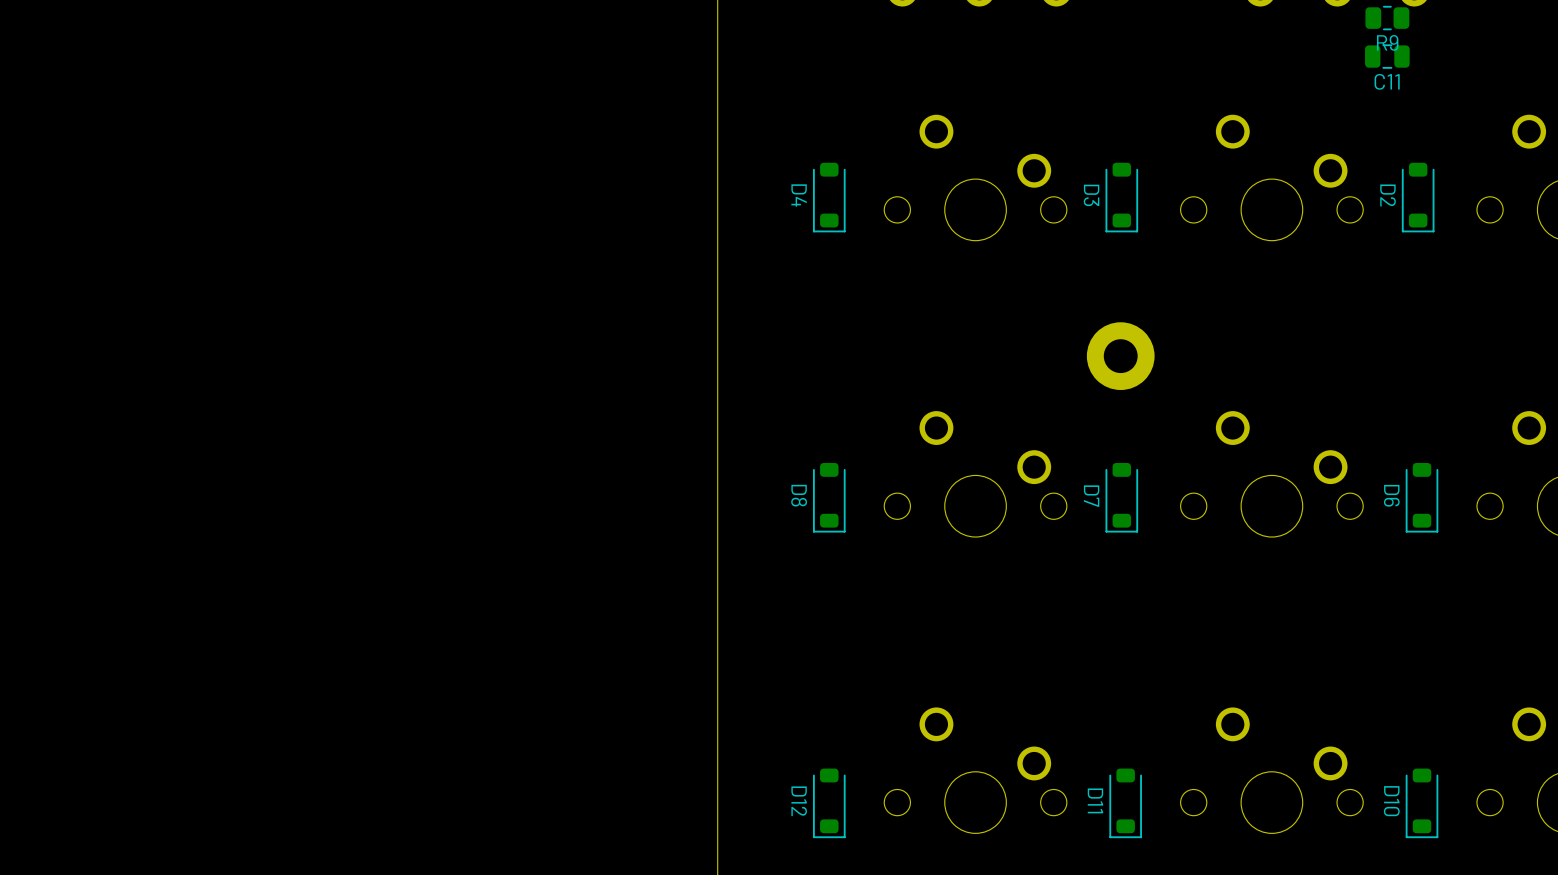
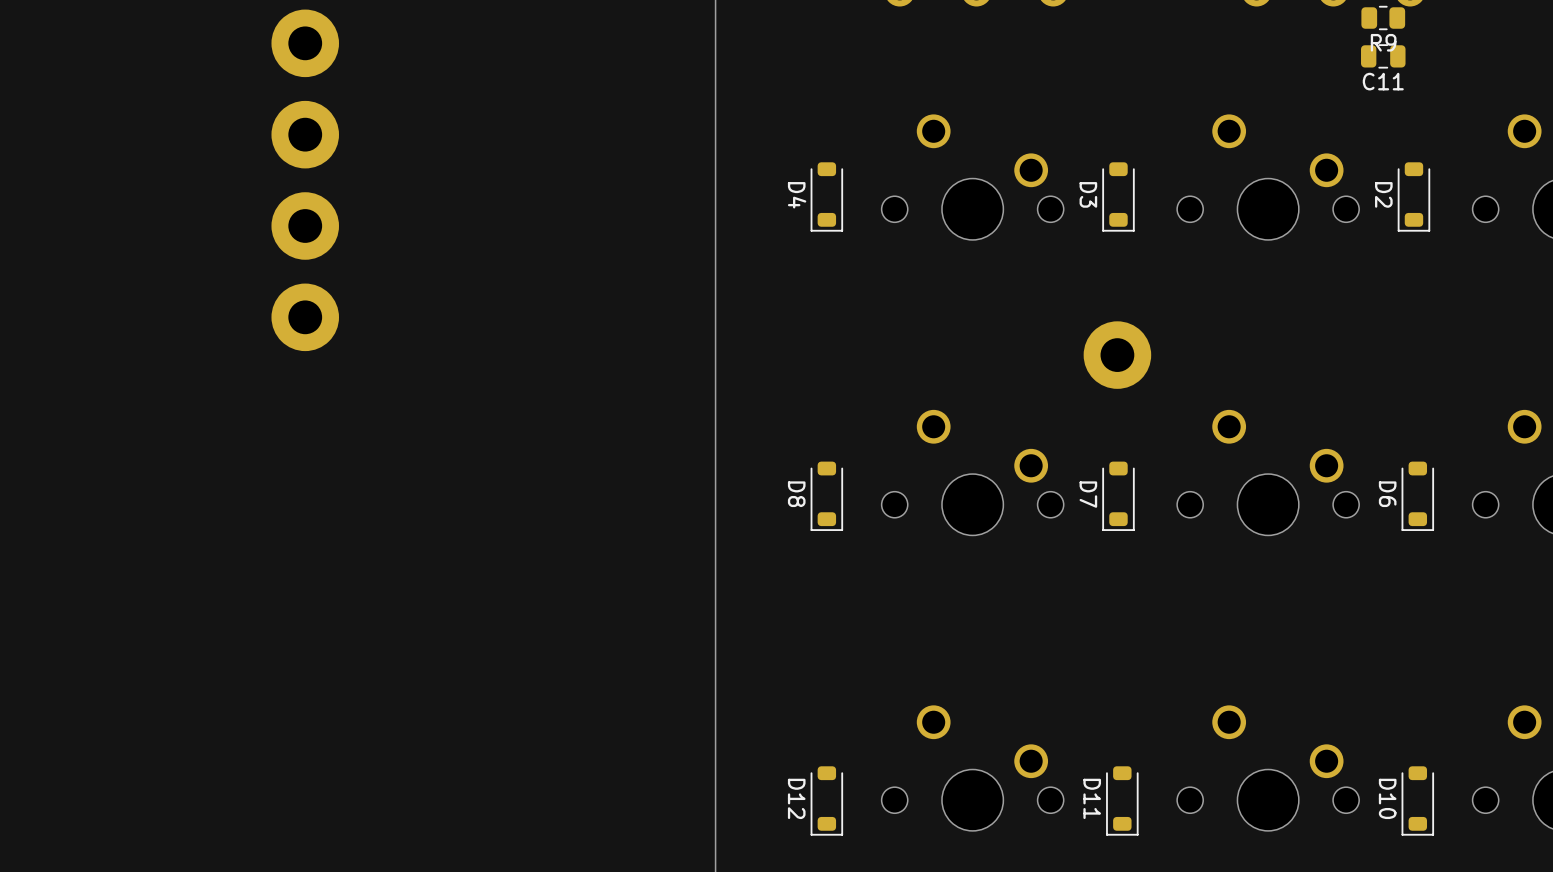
part: none -> (305, 43)
part: none -> (305, 134)
part: none -> (305, 225)
part: none -> (305, 317)

